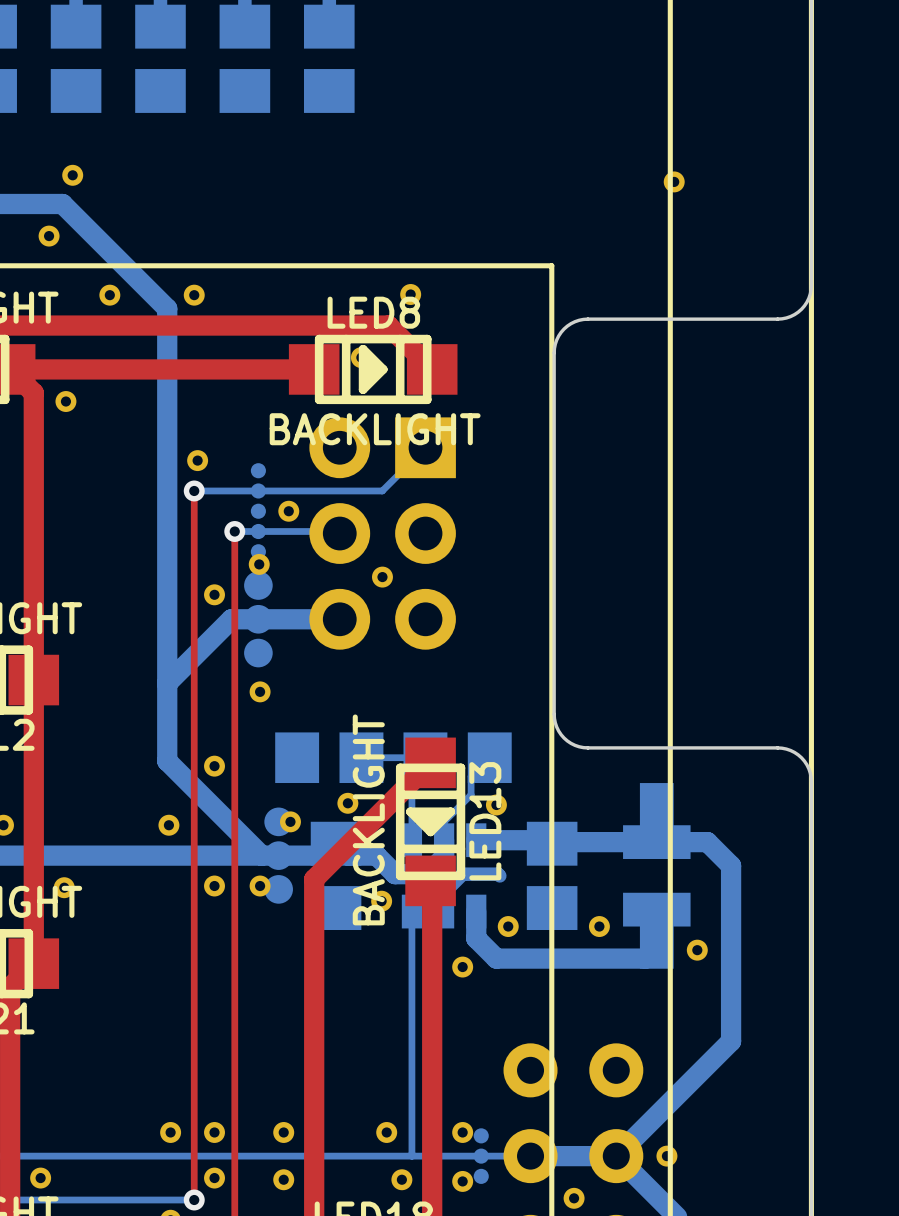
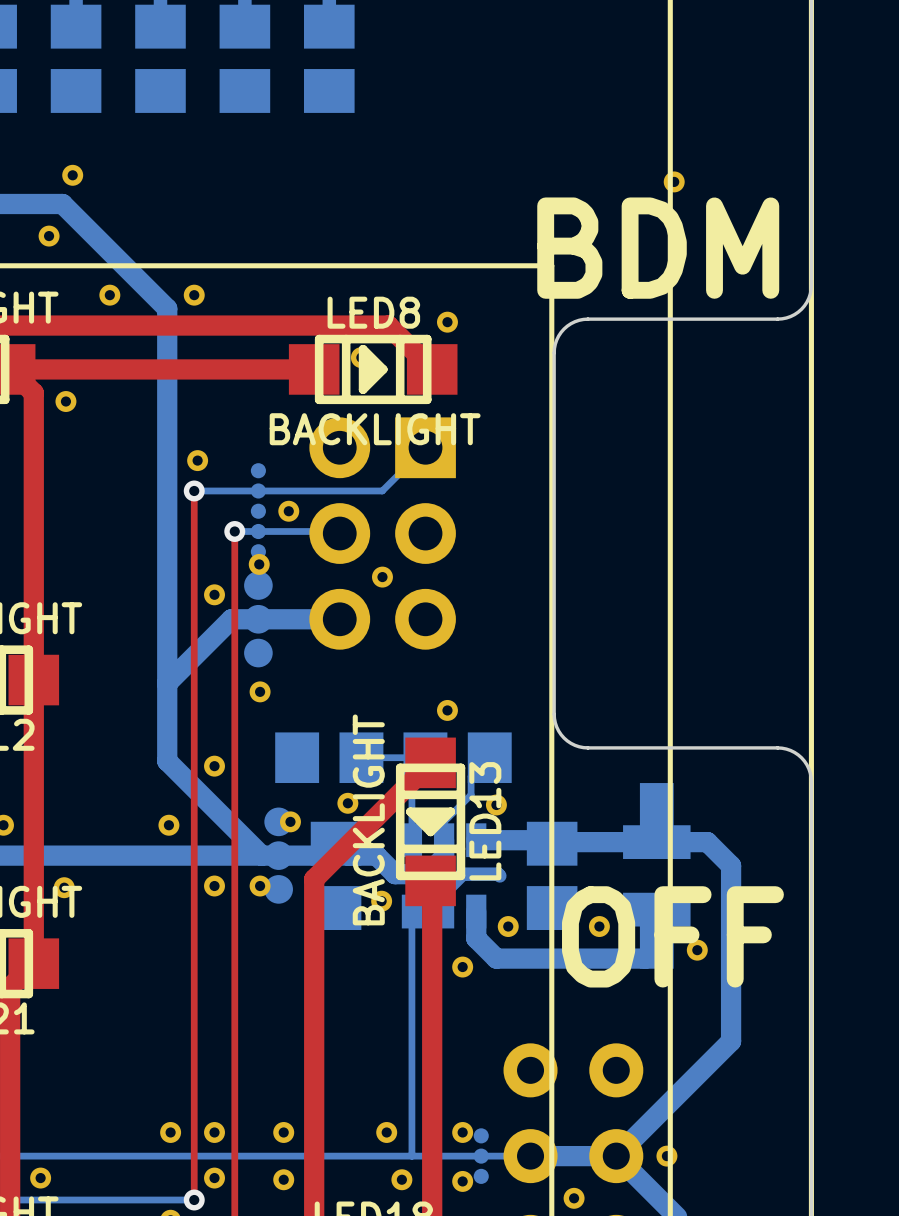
text: none -> BDM (658, 248)
part position: (410, 294) -> (447, 322)
part: none -> (447, 710)
text: none -> OFF (672, 936)

